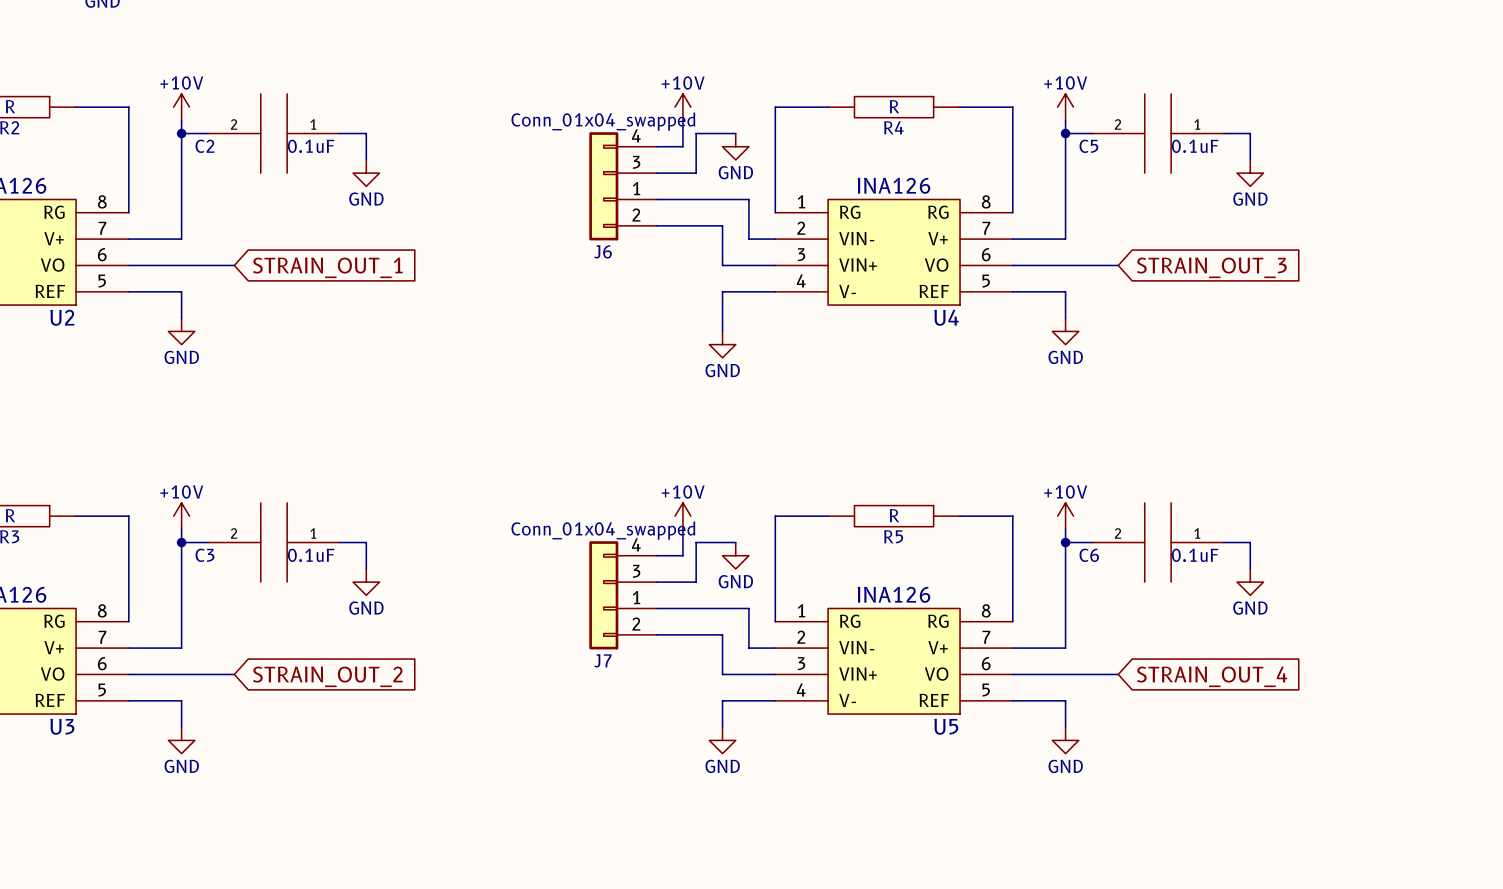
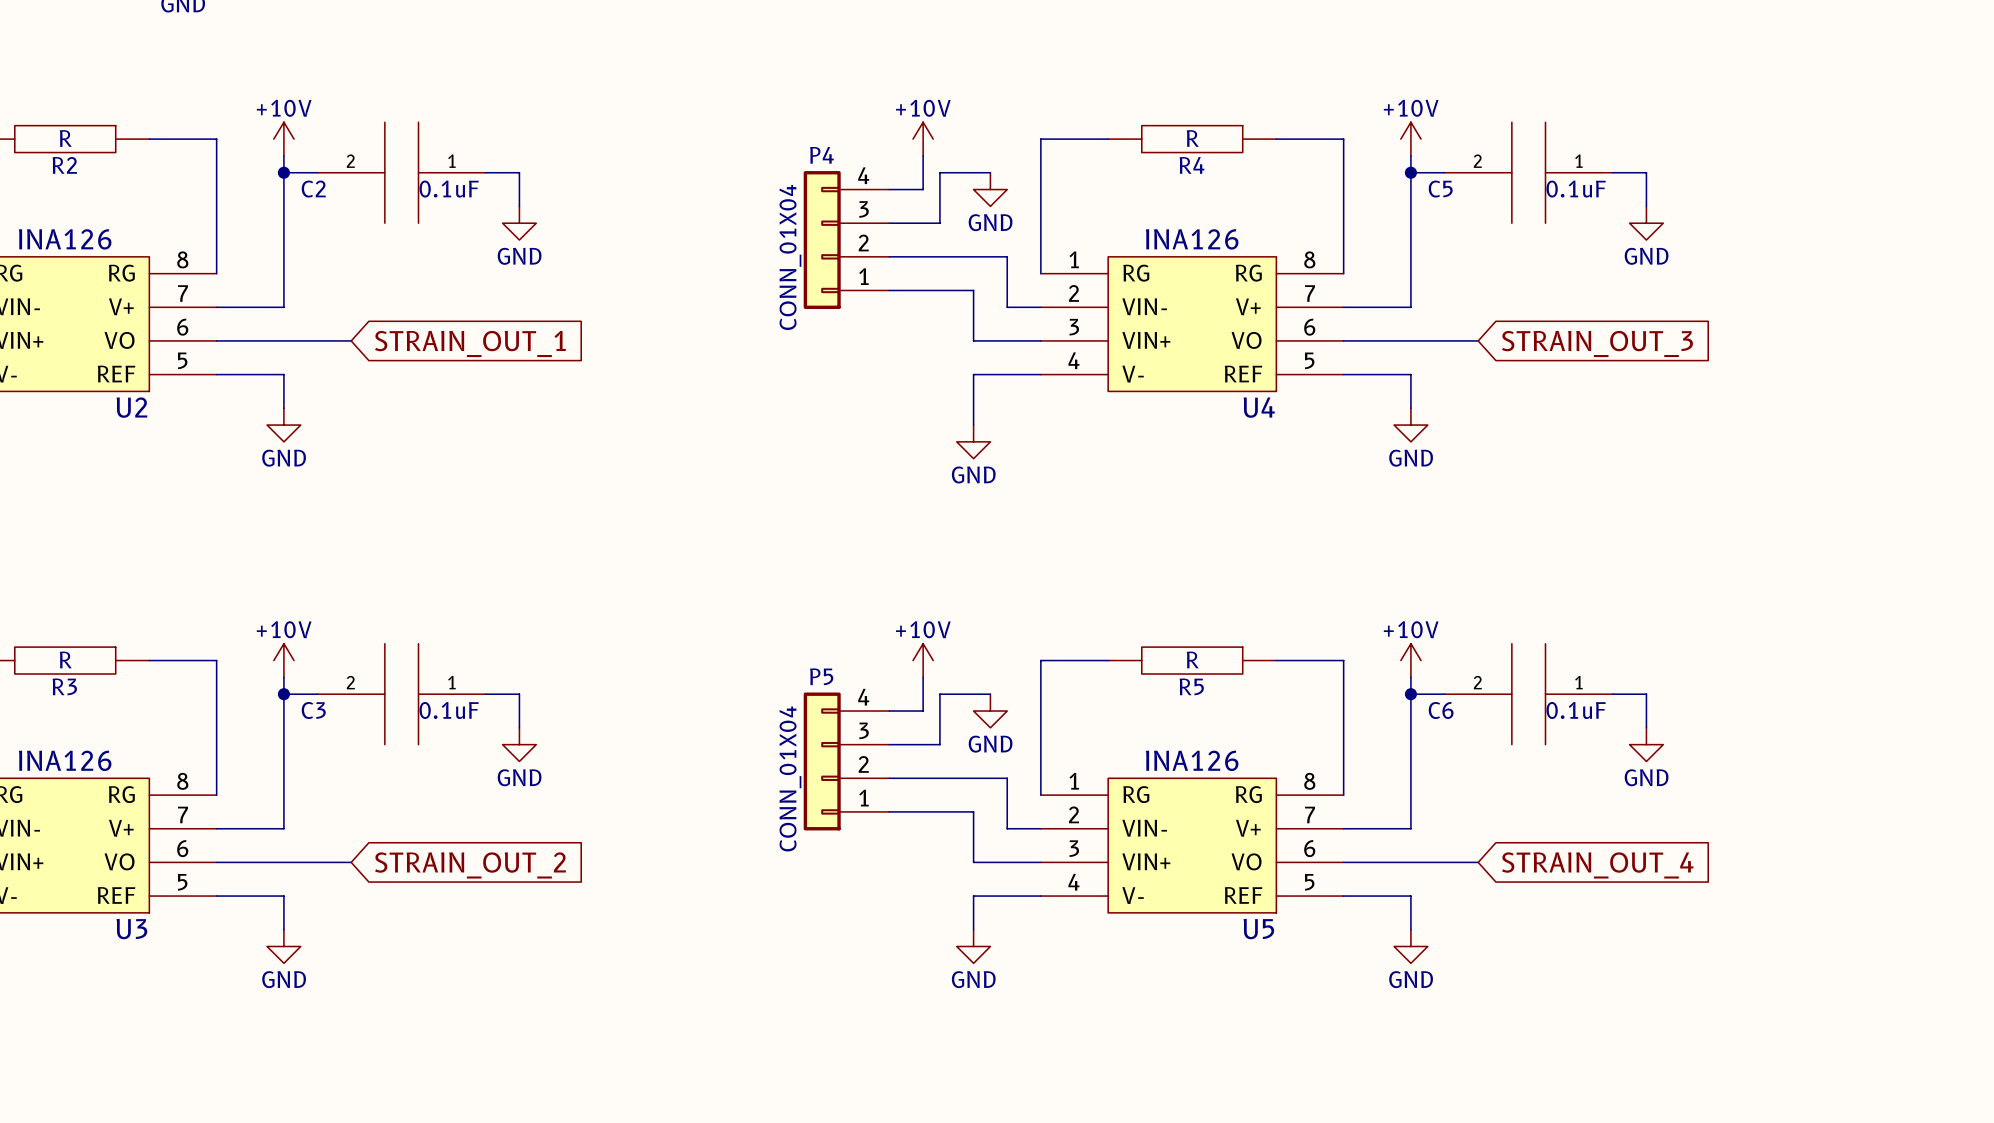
J6 value: Conn_01x04_swapped (603, 121) -> CONN_01X04 (790, 257)
J6 pin number: 1 (636, 188) -> 2 (863, 242)
J6 pin number: 2 (636, 215) -> 1 (863, 276)
J6 name: J6 (603, 251) -> P4 (821, 155)
J7 value: Conn_01x04_swapped (603, 530) -> CONN_01X04 (790, 778)
J7 pin number: 1 (636, 597) -> 2 (863, 764)
J7 pin number: 2 (636, 624) -> 1 (863, 798)
J7 name: J7 (602, 660) -> P5 (821, 676)

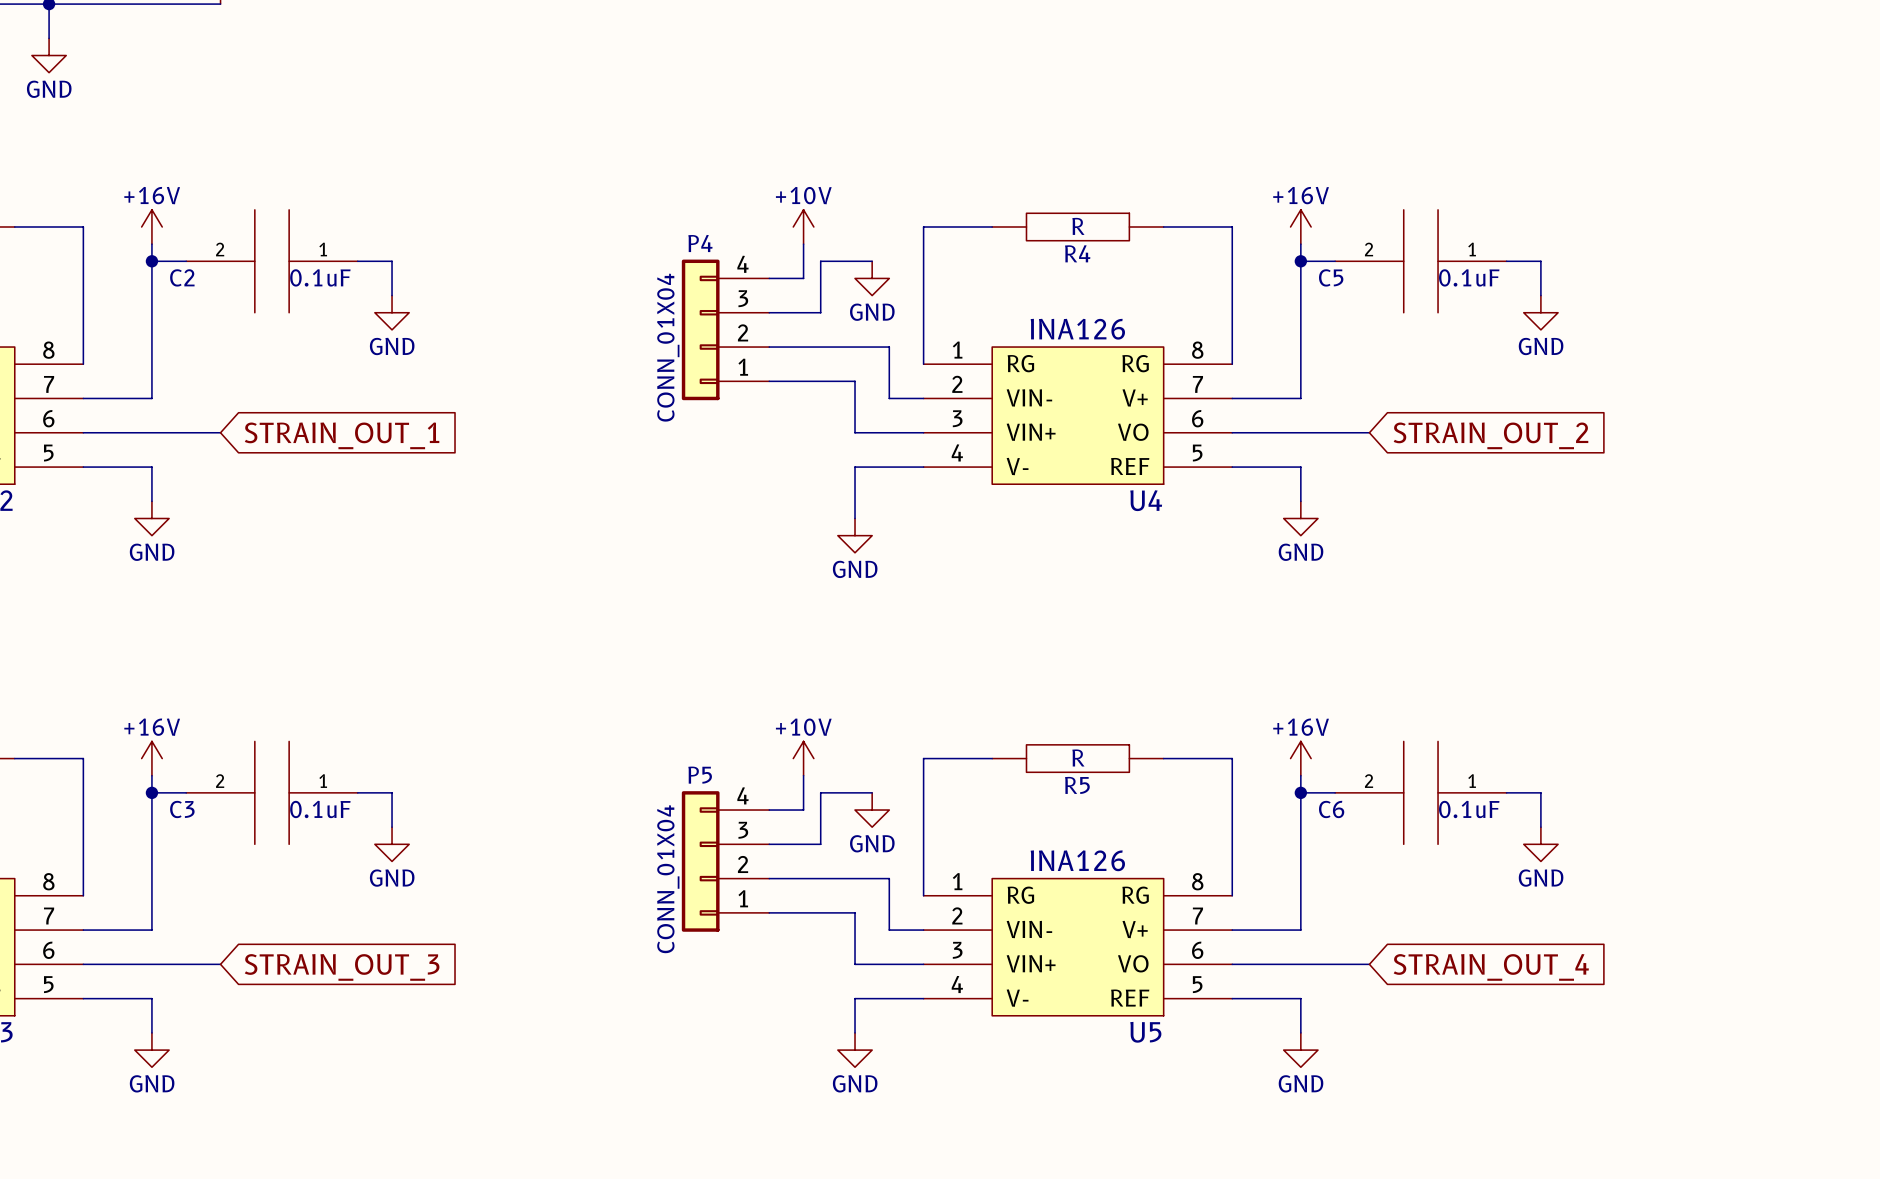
power symbol: +10V (283, 139) -> +16V (151, 226)
power symbol: +10V (1410, 139) -> +16V (1300, 226)
global label: STRAIN_OUT_3 (1597, 343) -> STRAIN_OUT_2 (1490, 435)
power symbol: +10V (283, 660) -> +16V (151, 758)
power symbol: +10V (1410, 660) -> +16V (1300, 758)
global label: STRAIN_OUT_2 (470, 865) -> STRAIN_OUT_3 (342, 967)

